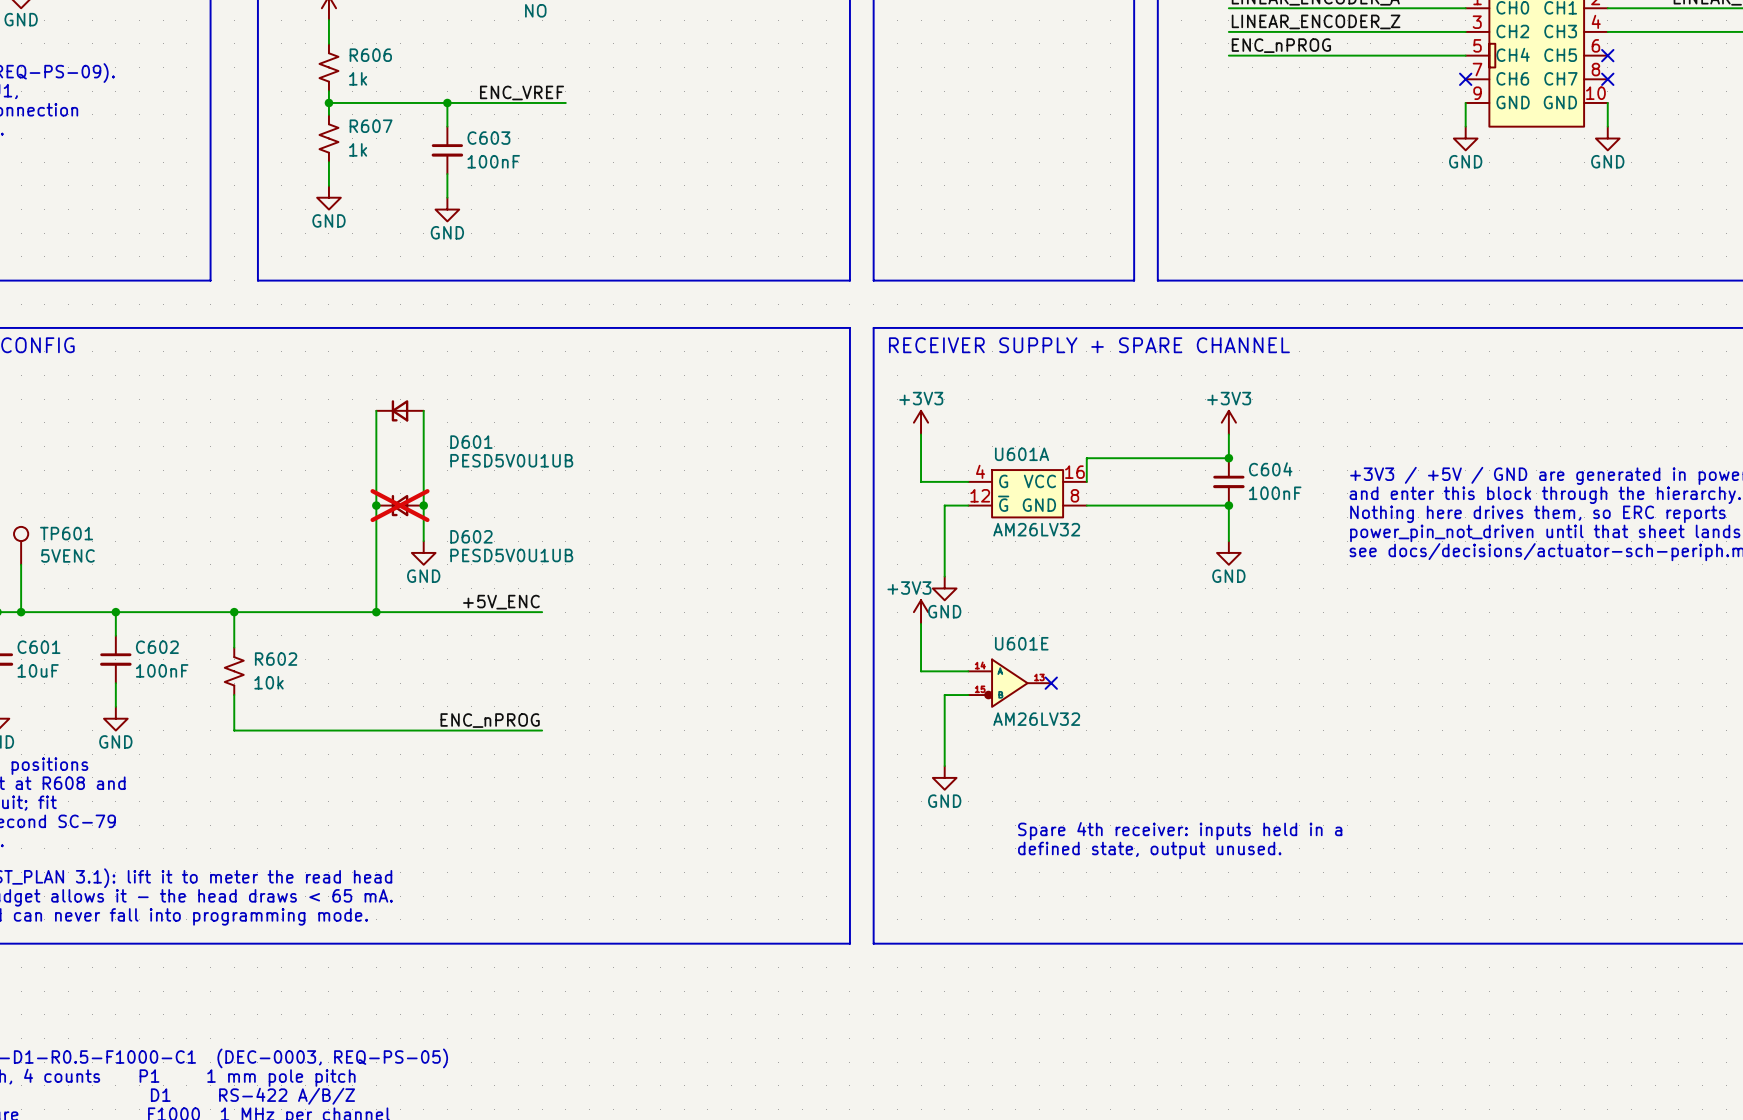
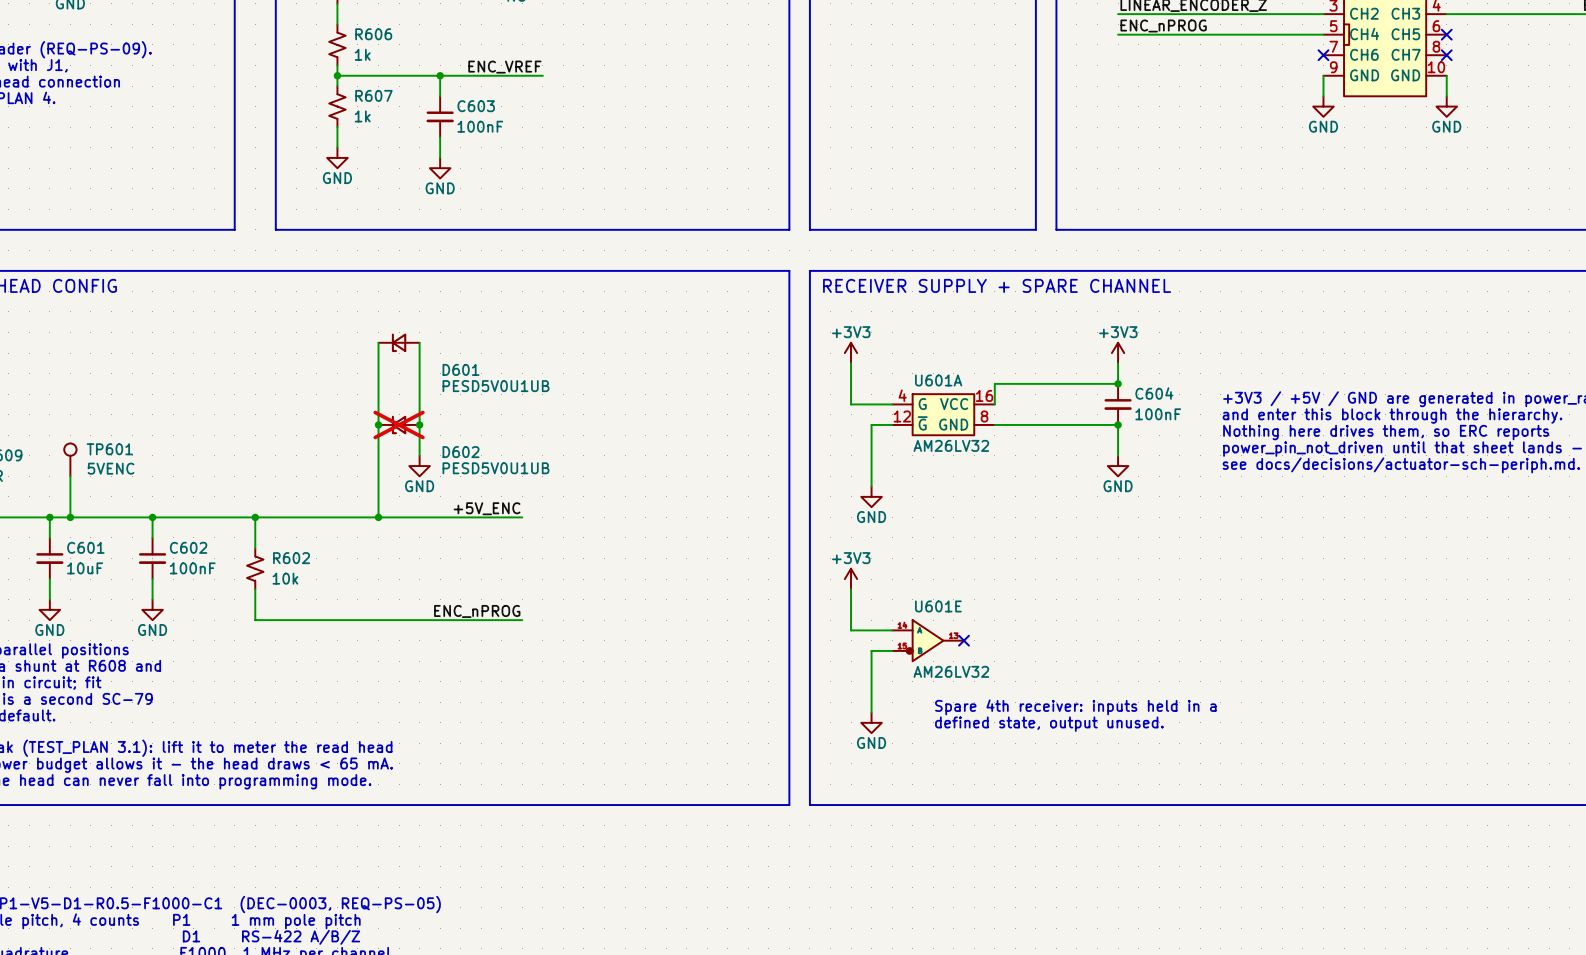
power symbol text position: +3V3 (909, 588) -> +3V3 (851, 558)
power symbol position: +3V3 (921, 612) -> +3V3 (851, 579)
wire: (921, 623) (921, 671) (968, 671) -> (851, 589) (851, 630) (892, 630)
U601E position: (1009, 683) -> (928, 640)
no-connect mark: (1051, 683) -> none
wire: (968, 695) (944, 695) (944, 766) -> (892, 650) (871, 650) (871, 712)
no-connect mark: none -> (963, 640)
power symbol position: GND (944, 777) -> GND (871, 722)

